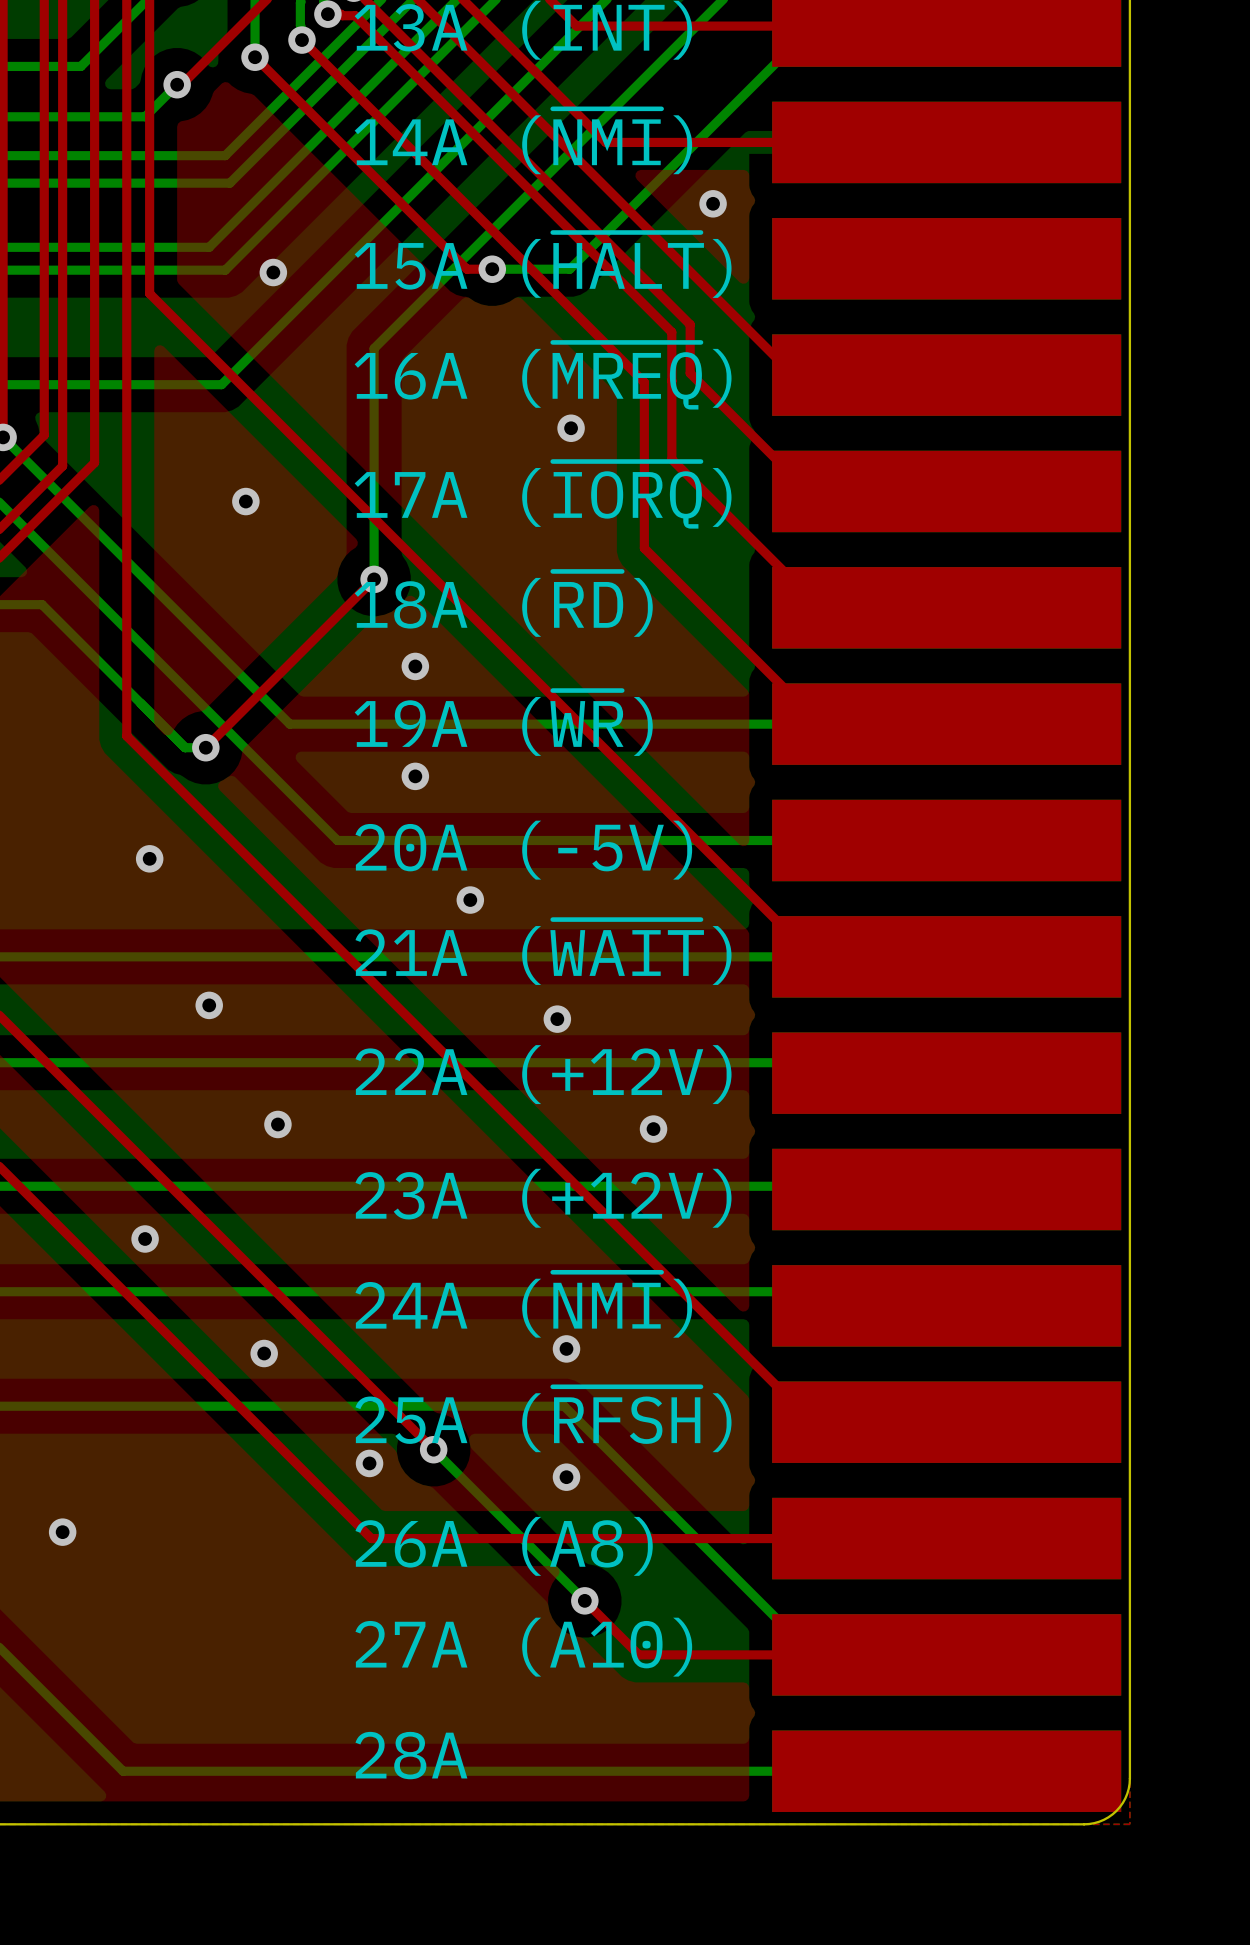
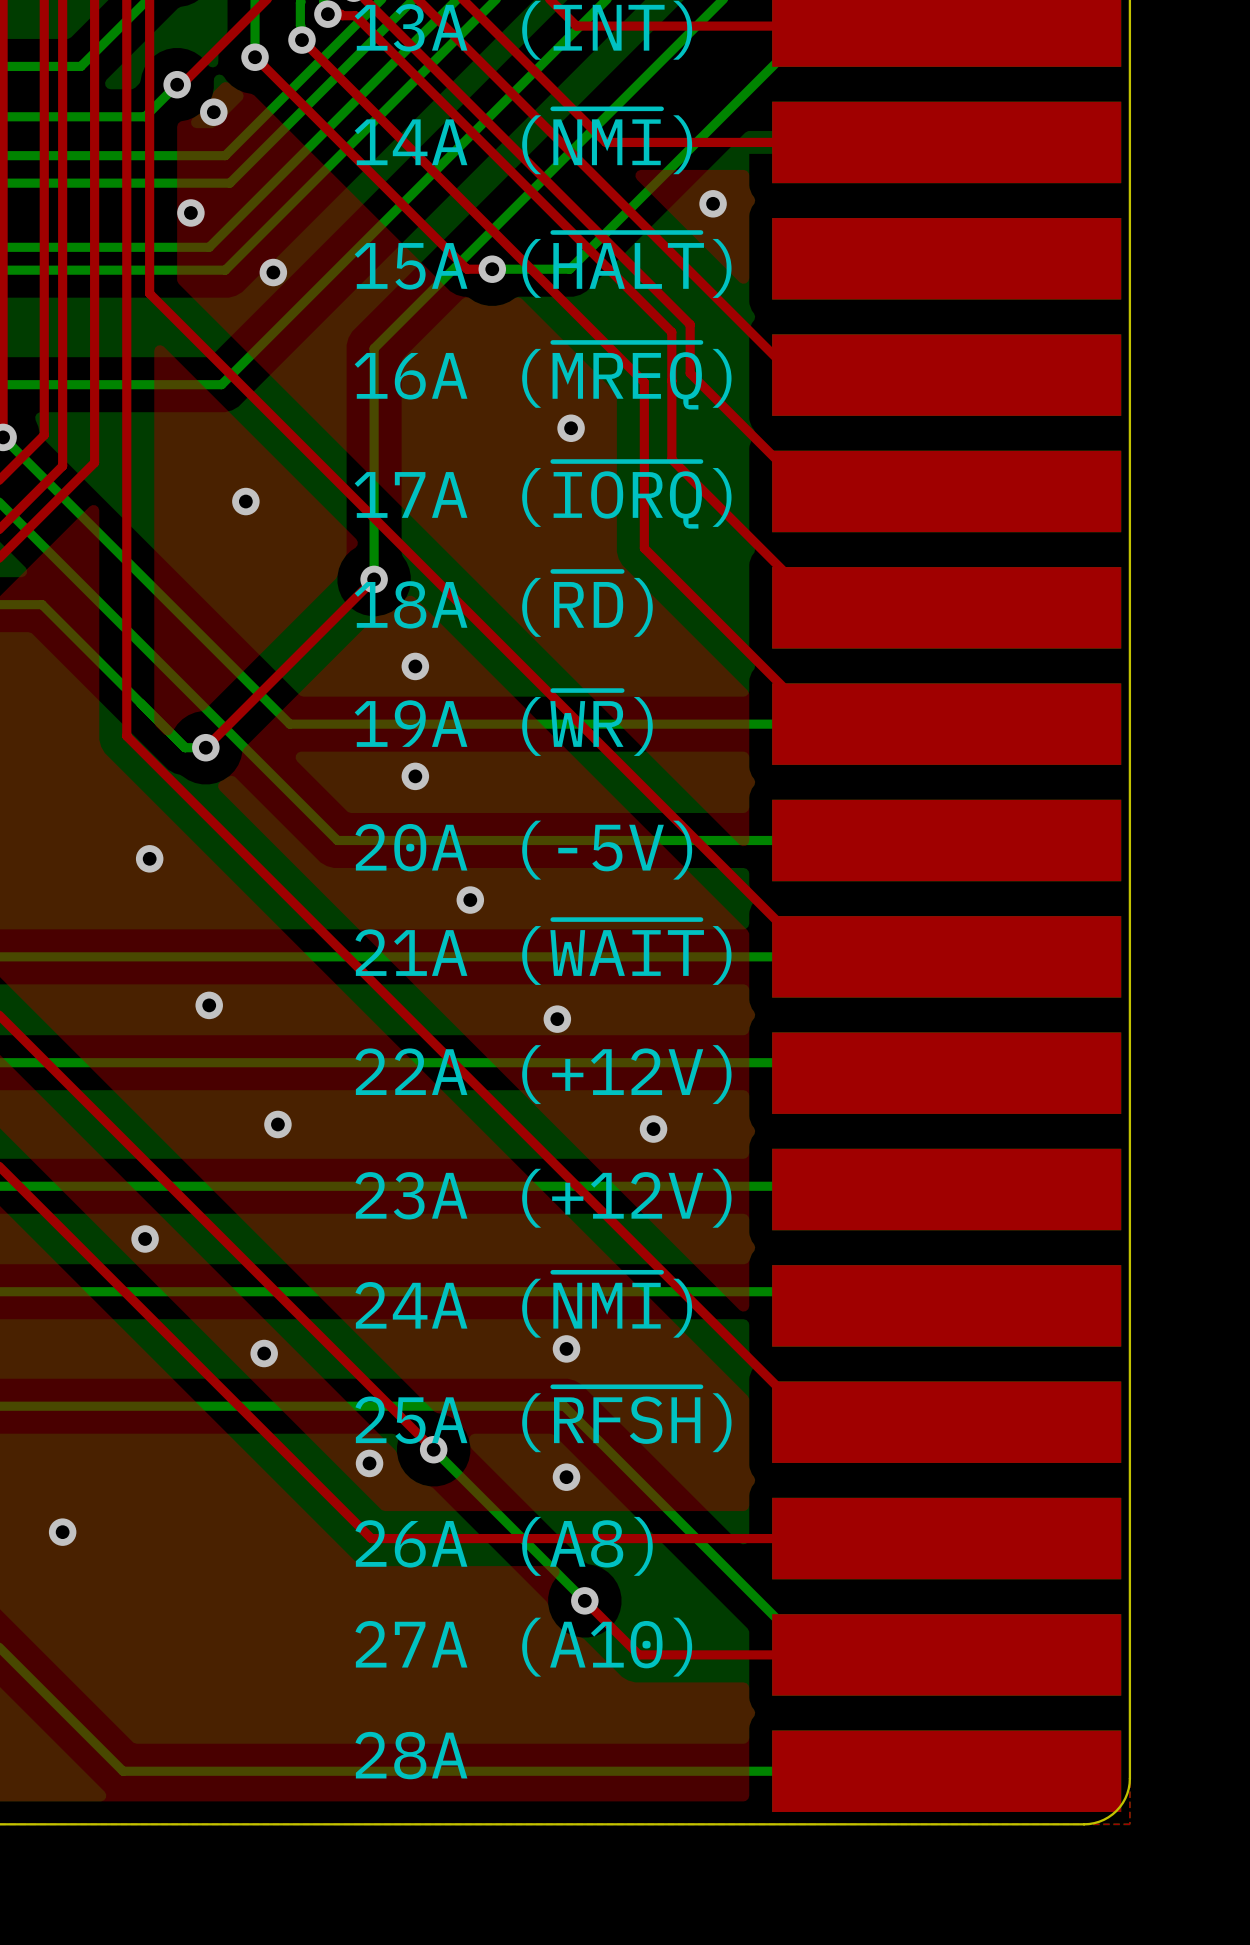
via: none -> (213, 112)
via: none -> (190, 212)

